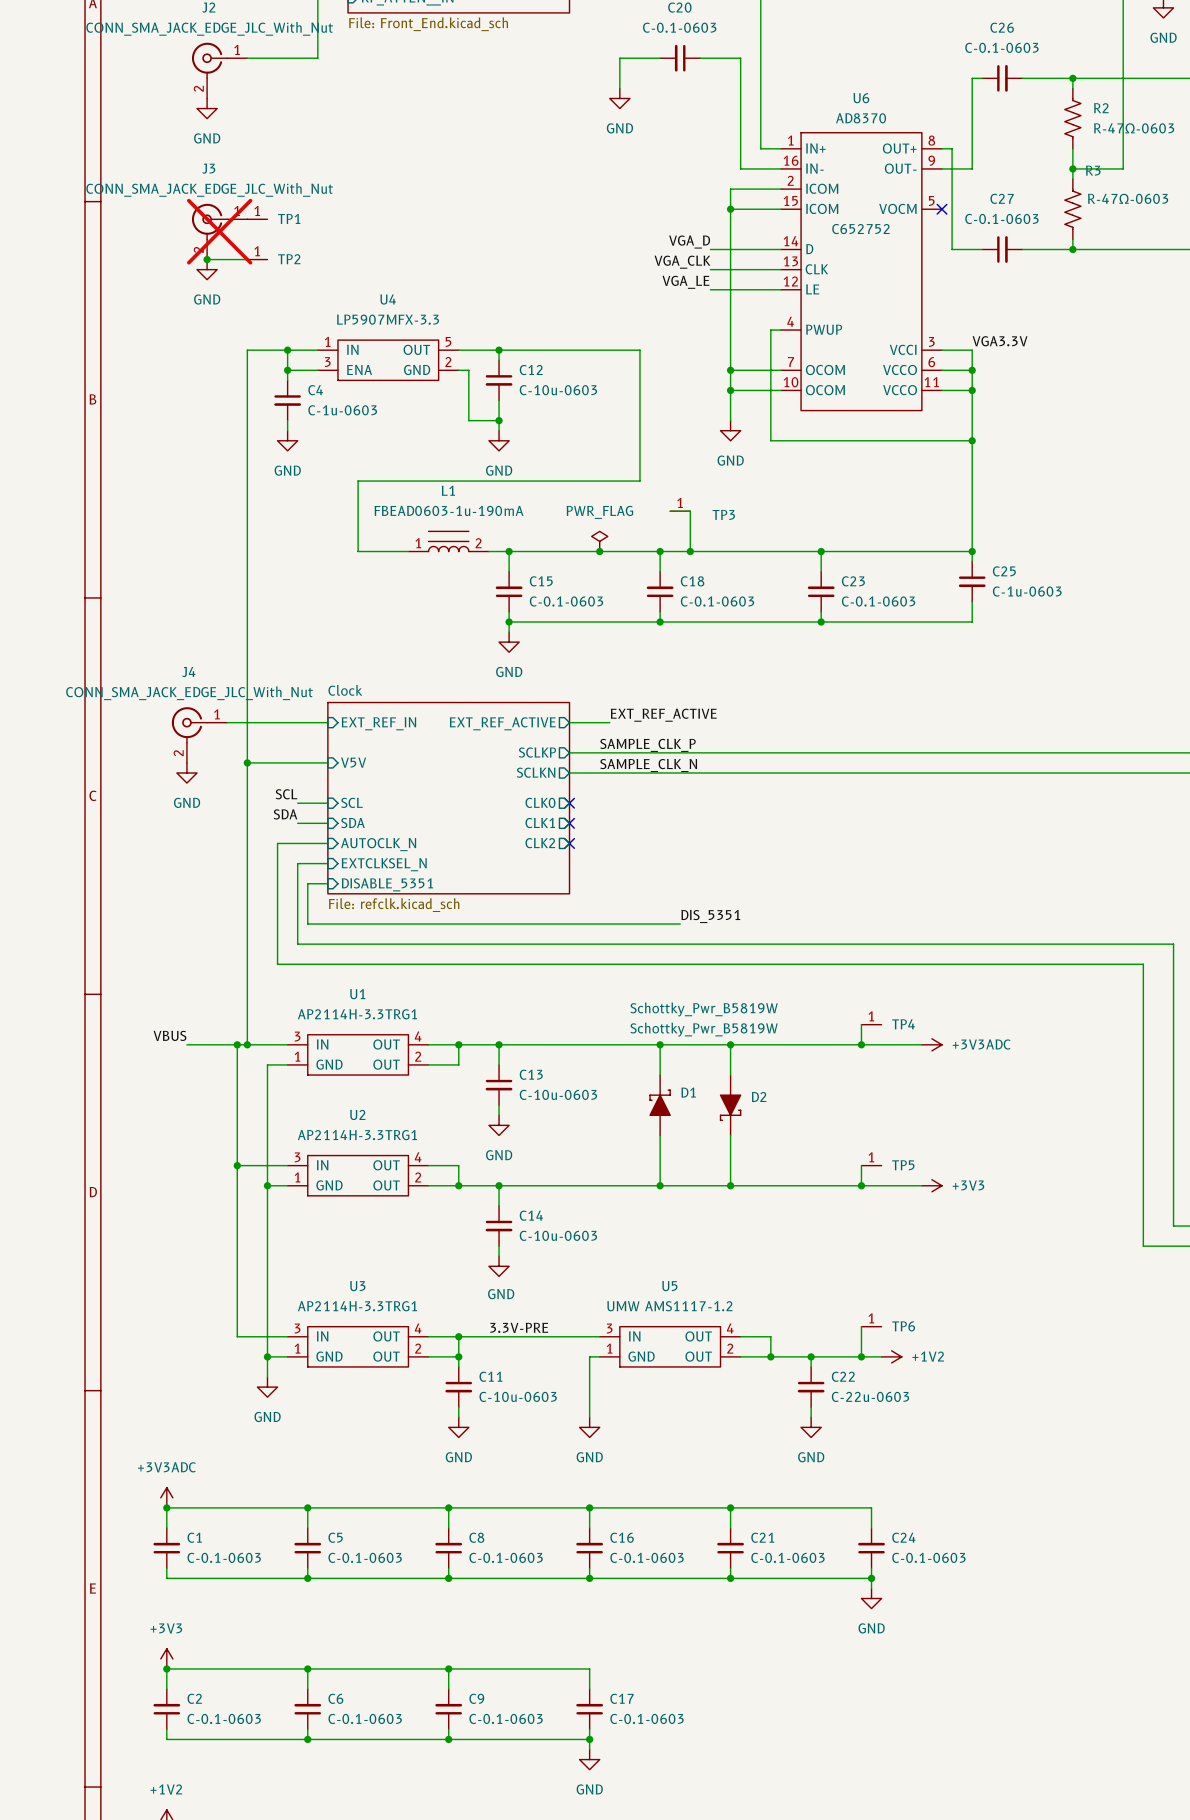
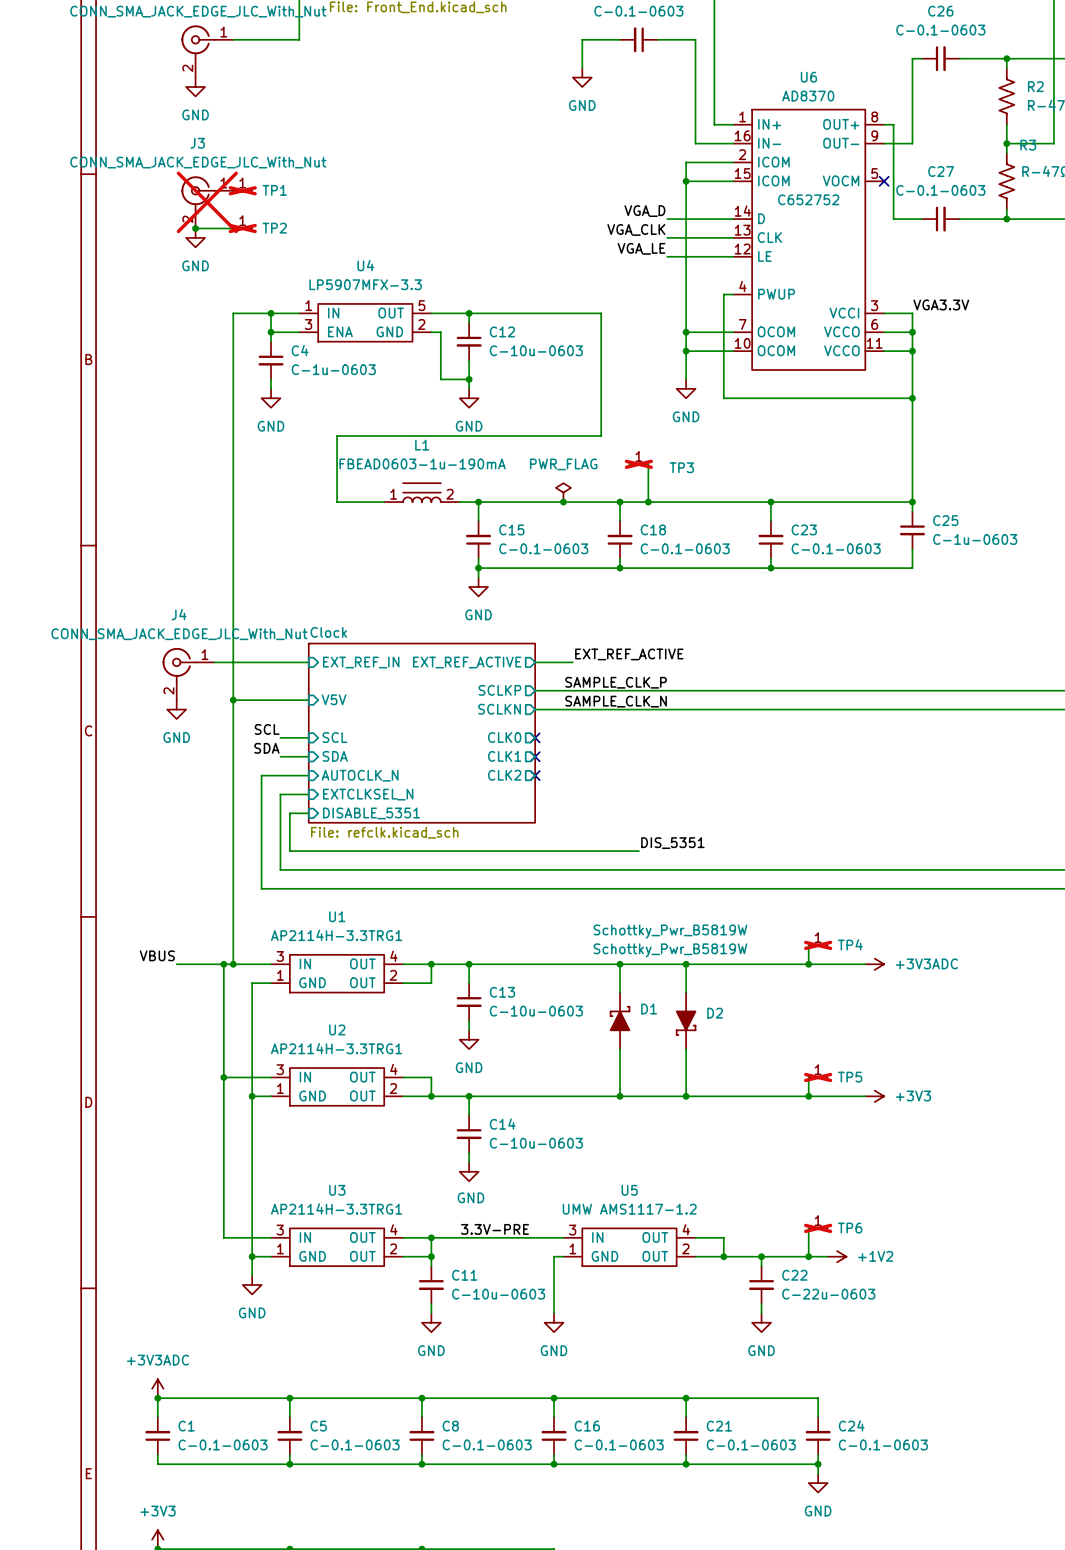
TP1 do-not-place cross: none -> (242, 190)
TP2 do-not-place cross: none -> (242, 228)
TP3 do-not-place cross: none -> (638, 464)
TP4 do-not-place cross: none -> (818, 945)
TP5 do-not-place cross: none -> (818, 1077)
TP6 do-not-place cross: none -> (818, 1228)

